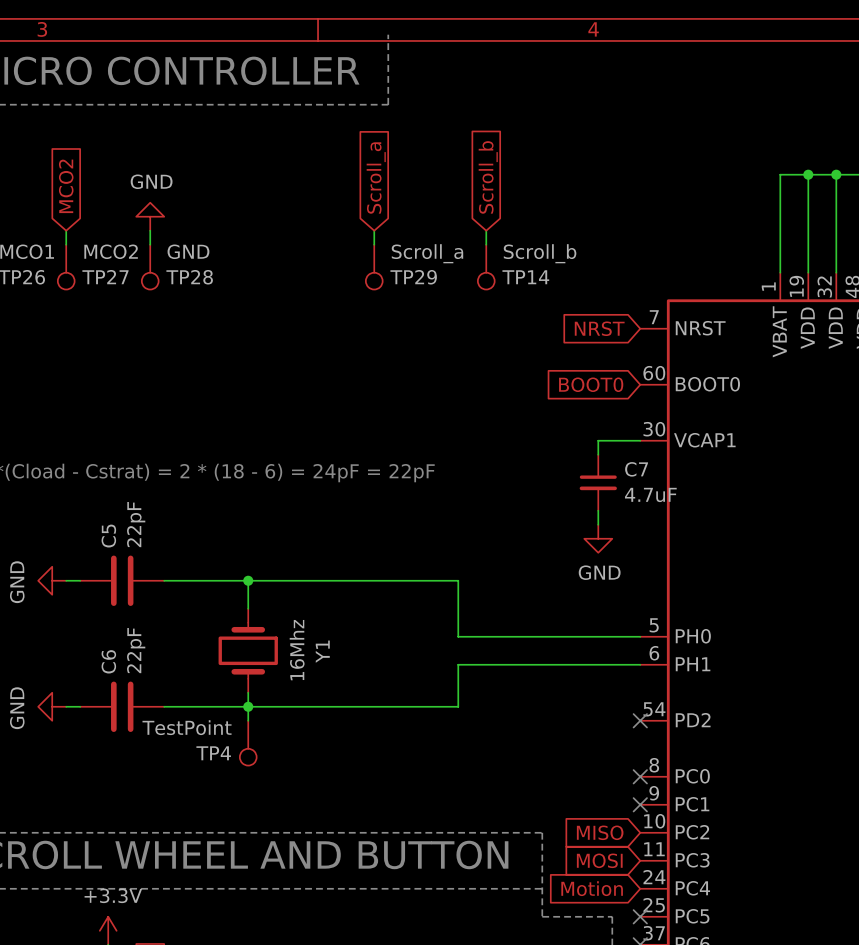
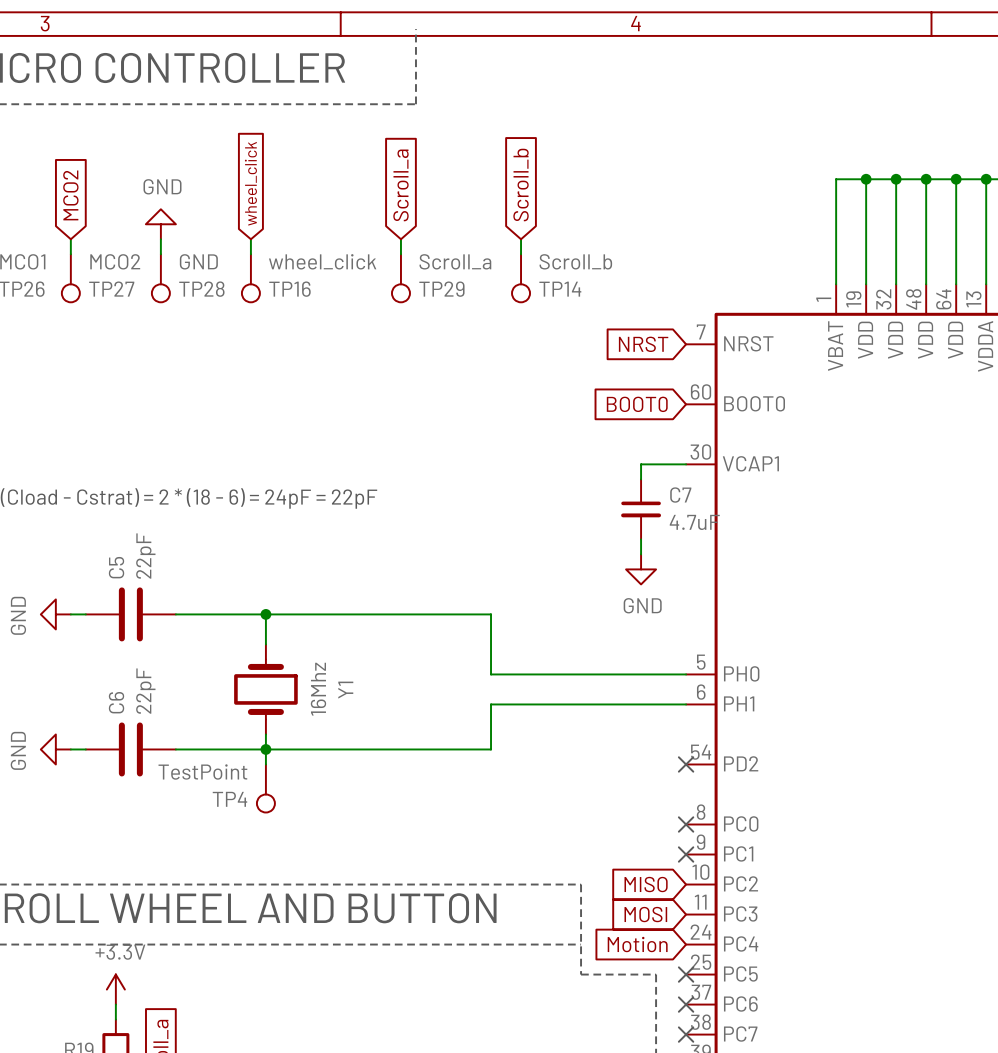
global label: none -> wheel_click (250, 183)
wire: none -> (250, 239) (250, 254)
TP16: none -> wheel_click (250, 278)

